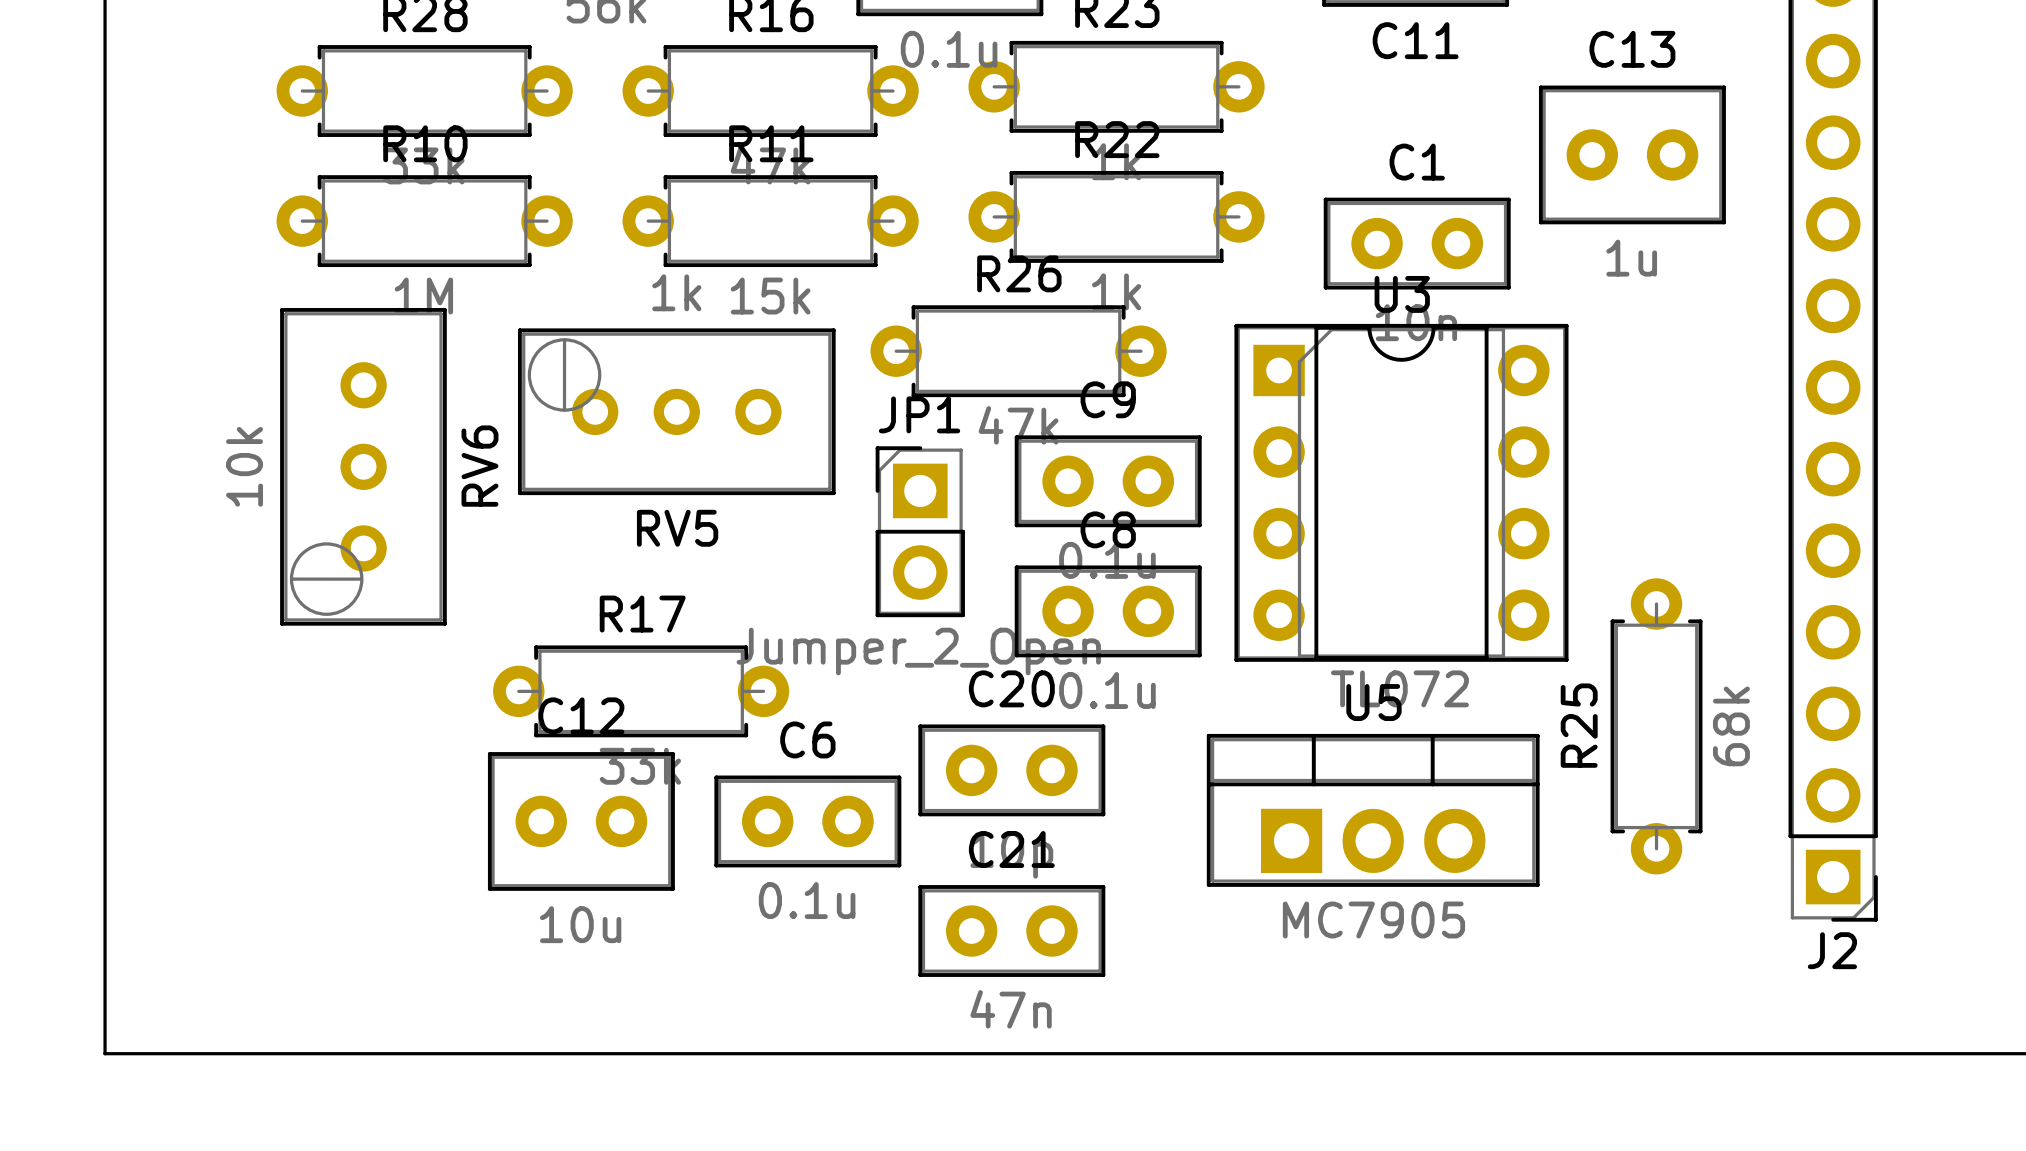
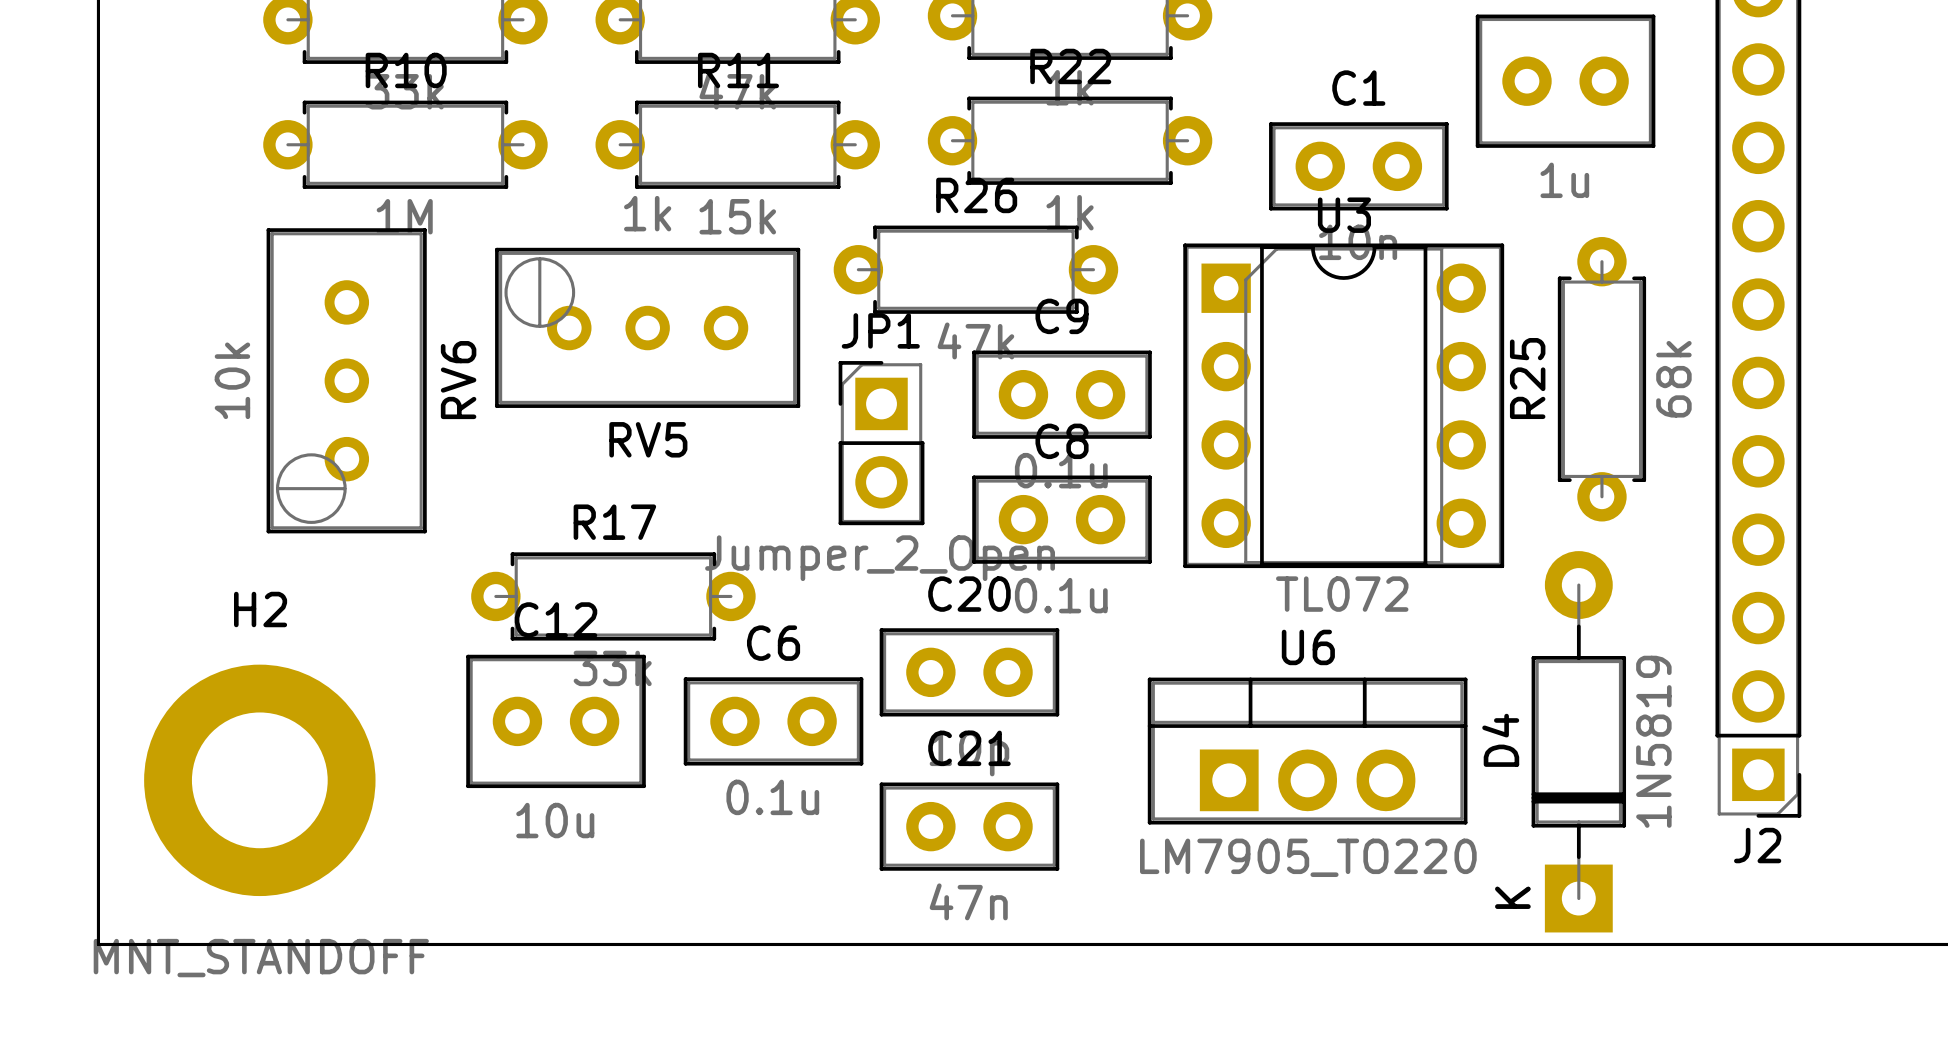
R25 position: (1656, 726) -> (1601, 379)
U5: MC7905 (1373, 810) -> none
D4: none -> 1N5819 (1578, 741)
U6: none -> LM7905_TO220 (1307, 751)
H2: none -> MNT_STANDOFF (259, 780)

